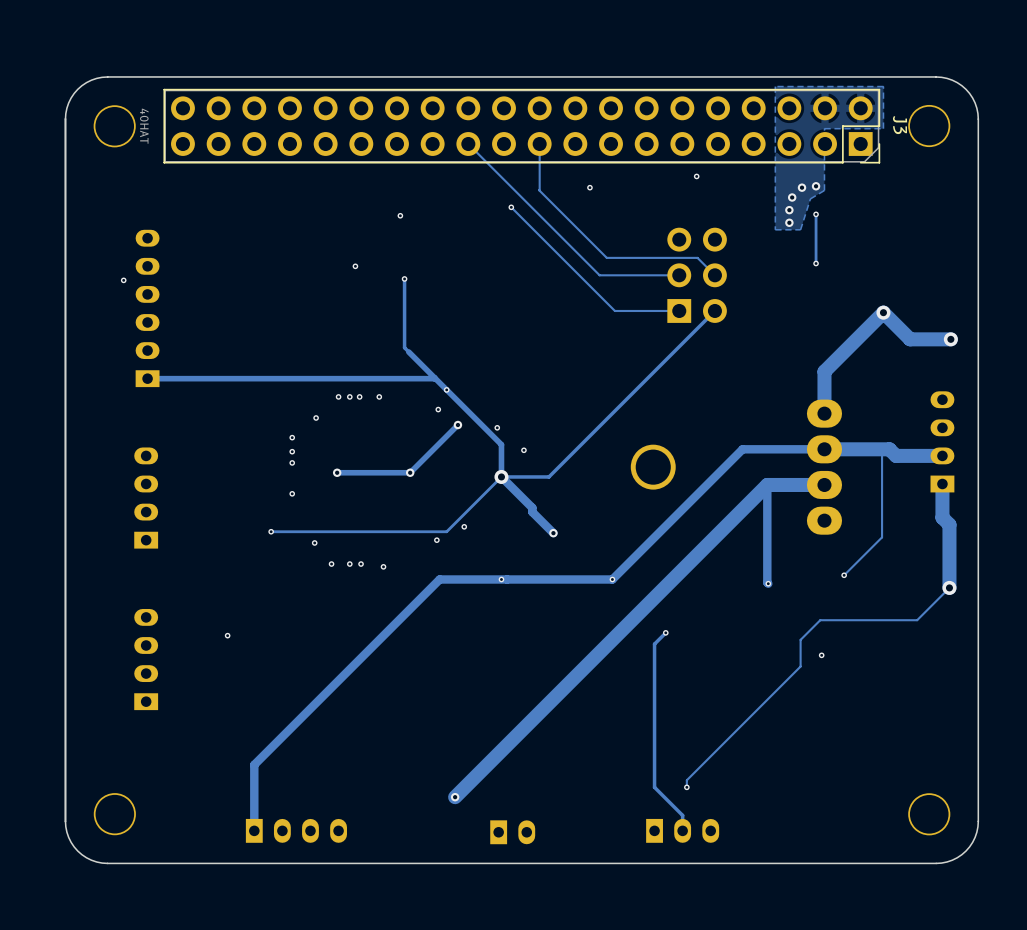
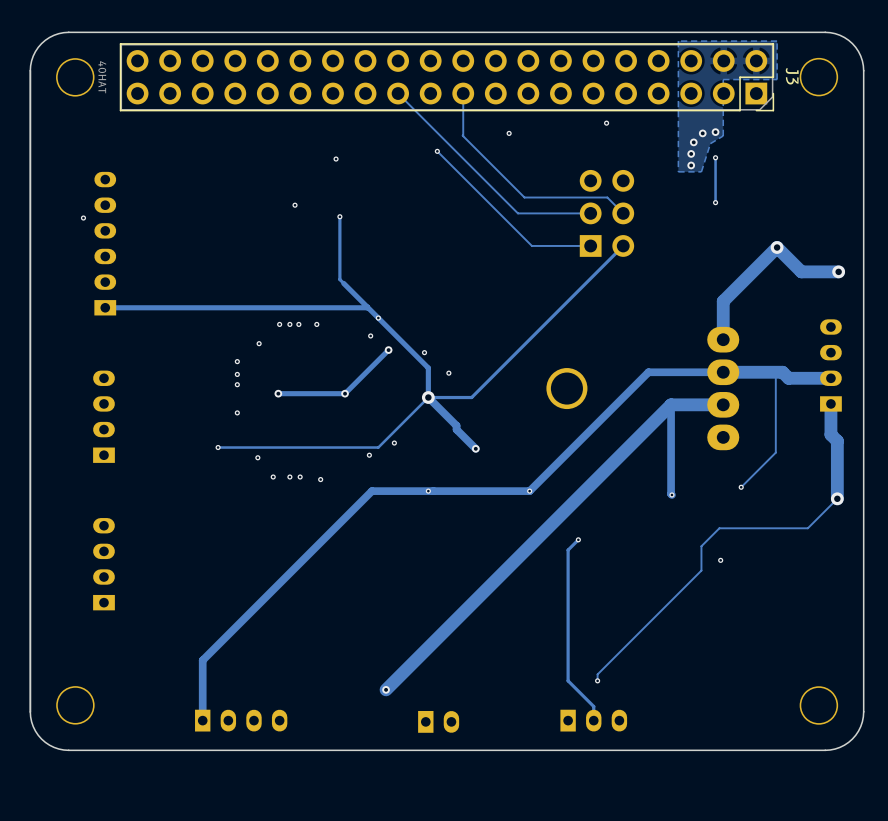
via: (227, 635) -> none

